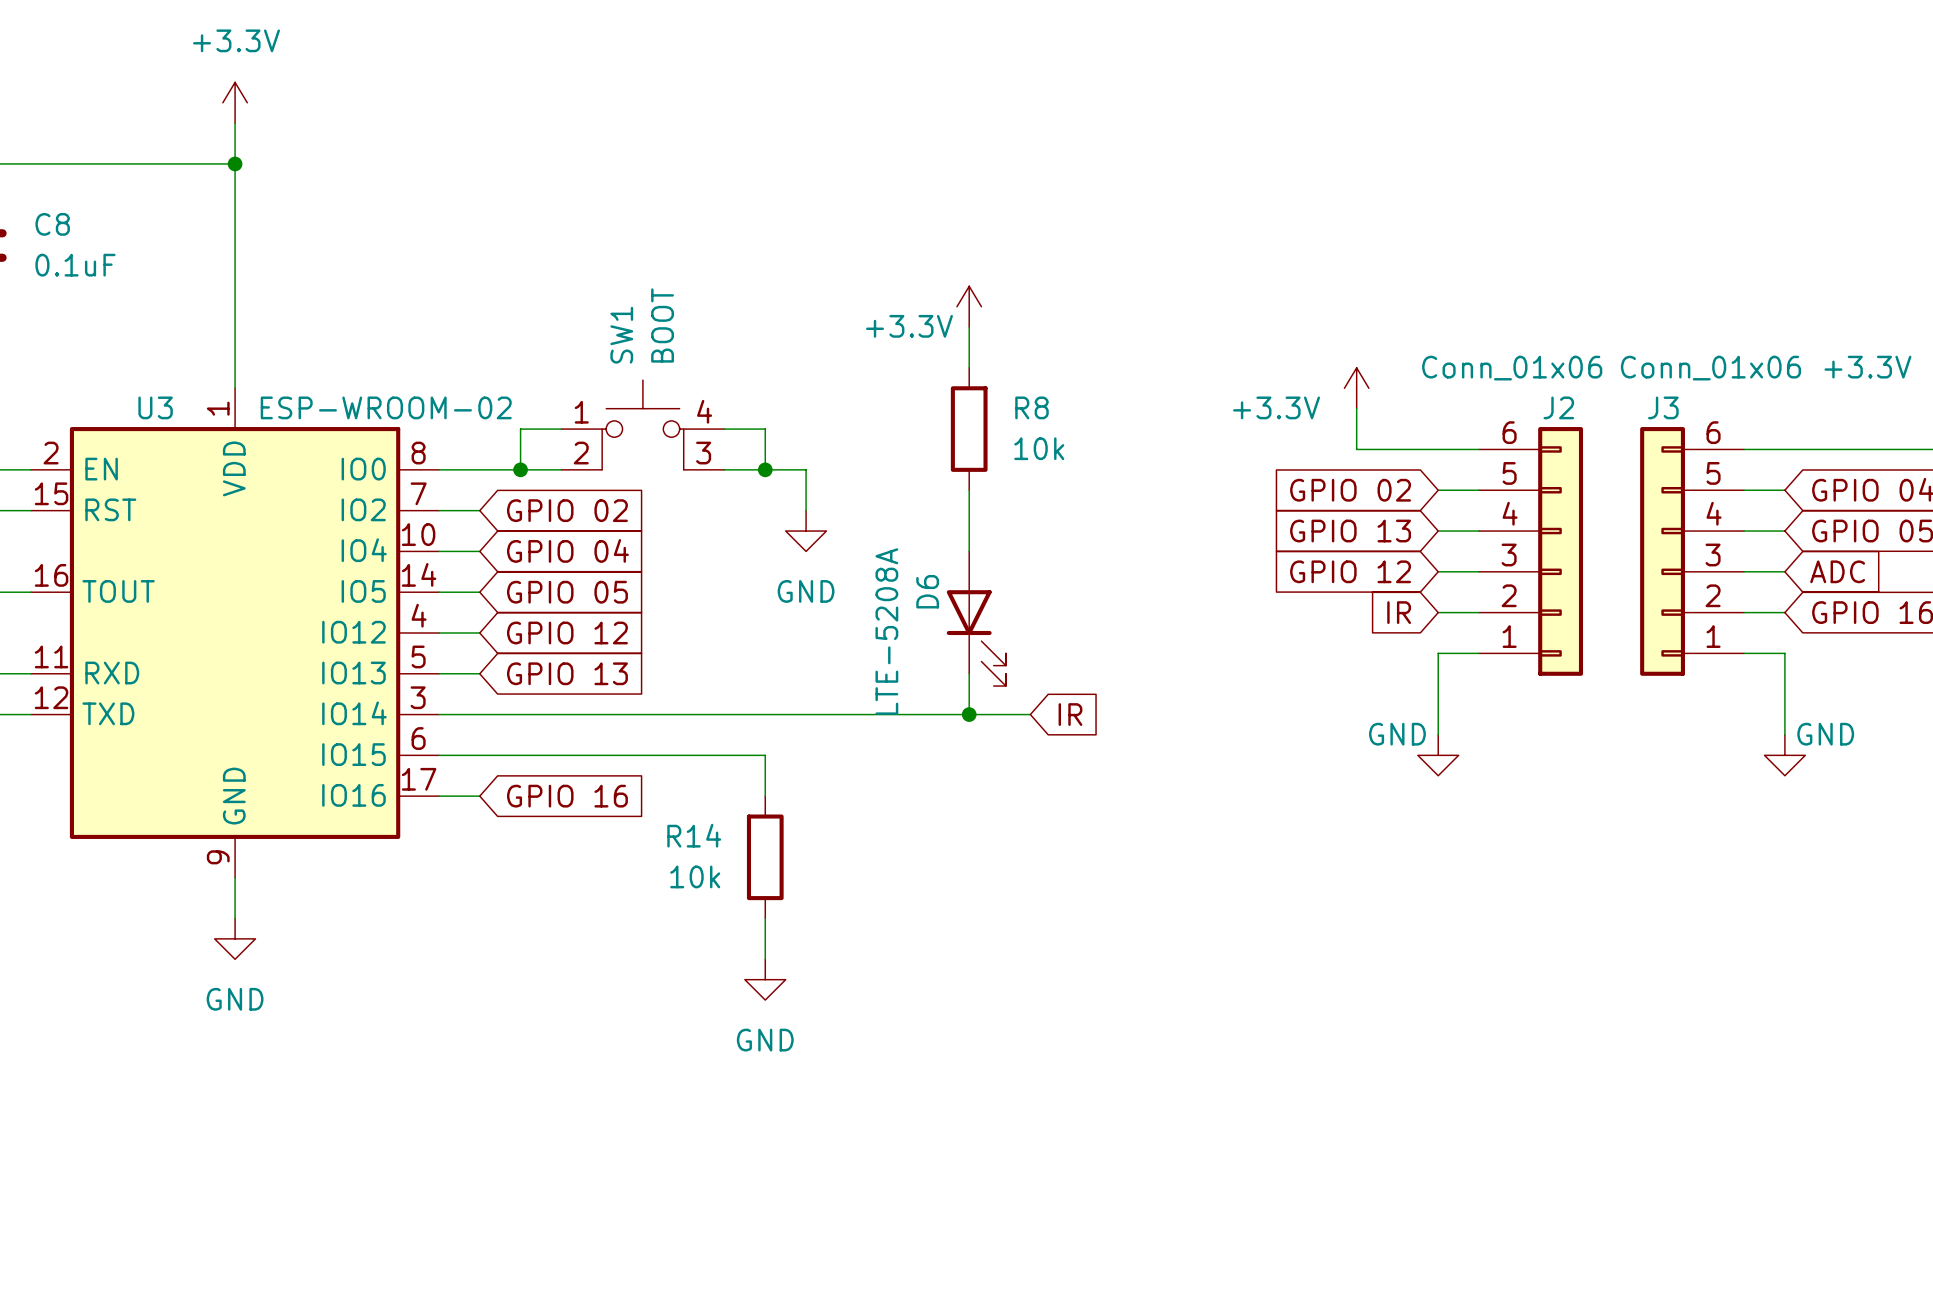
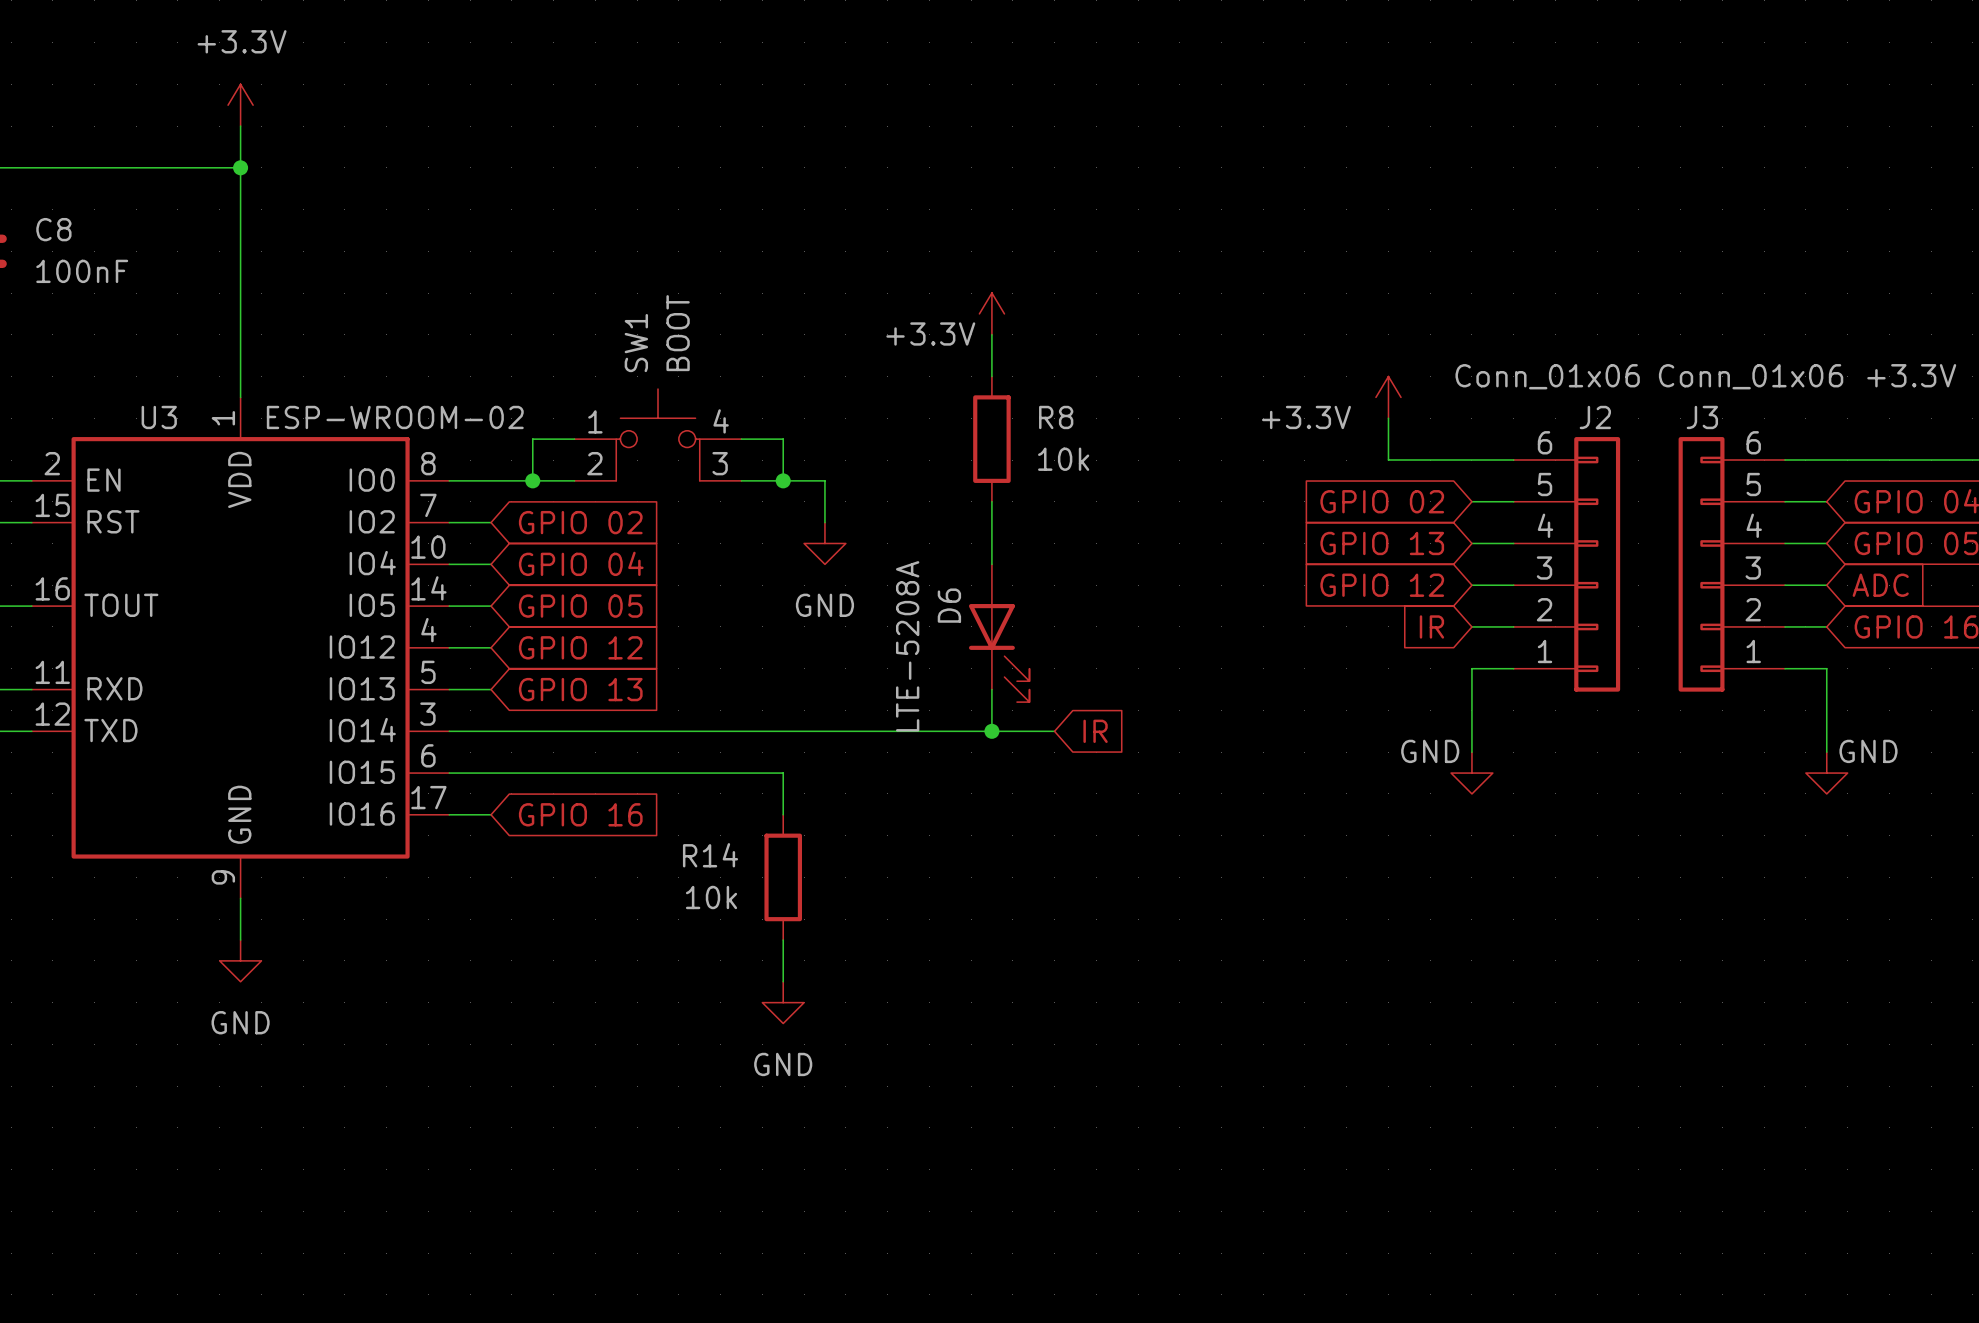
C8 value: 0.1uF (75, 265) -> 100nF (82, 271)

